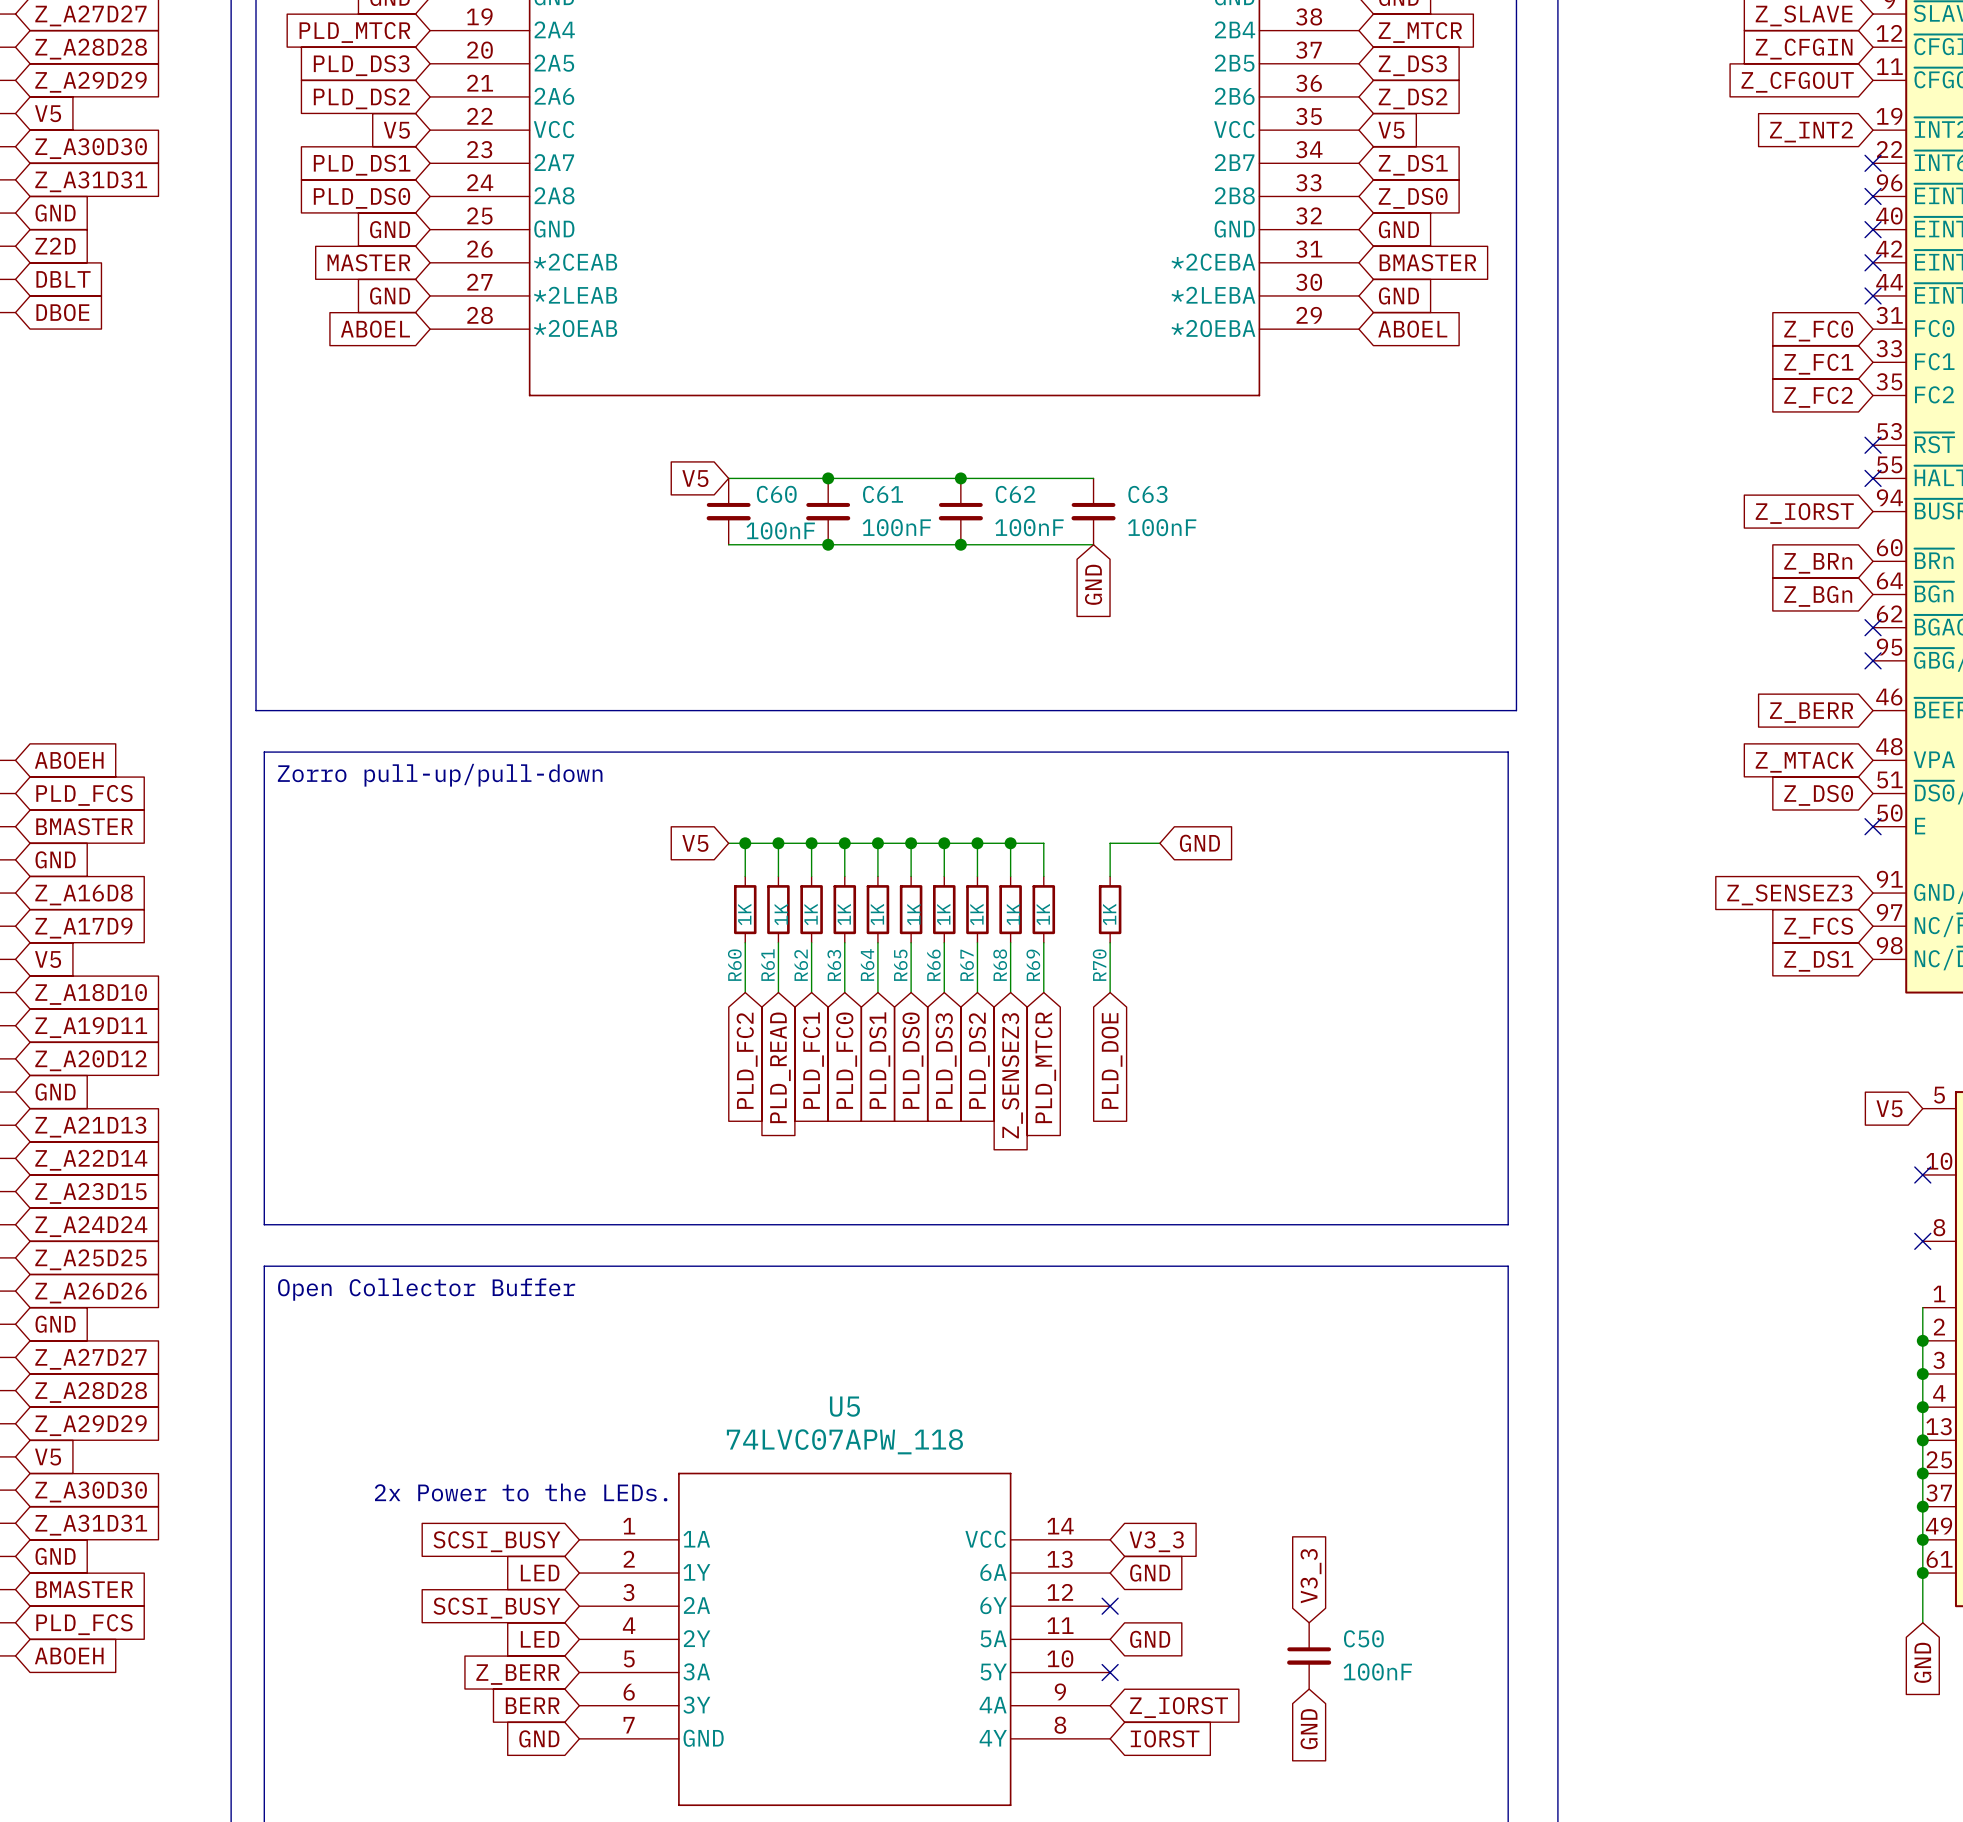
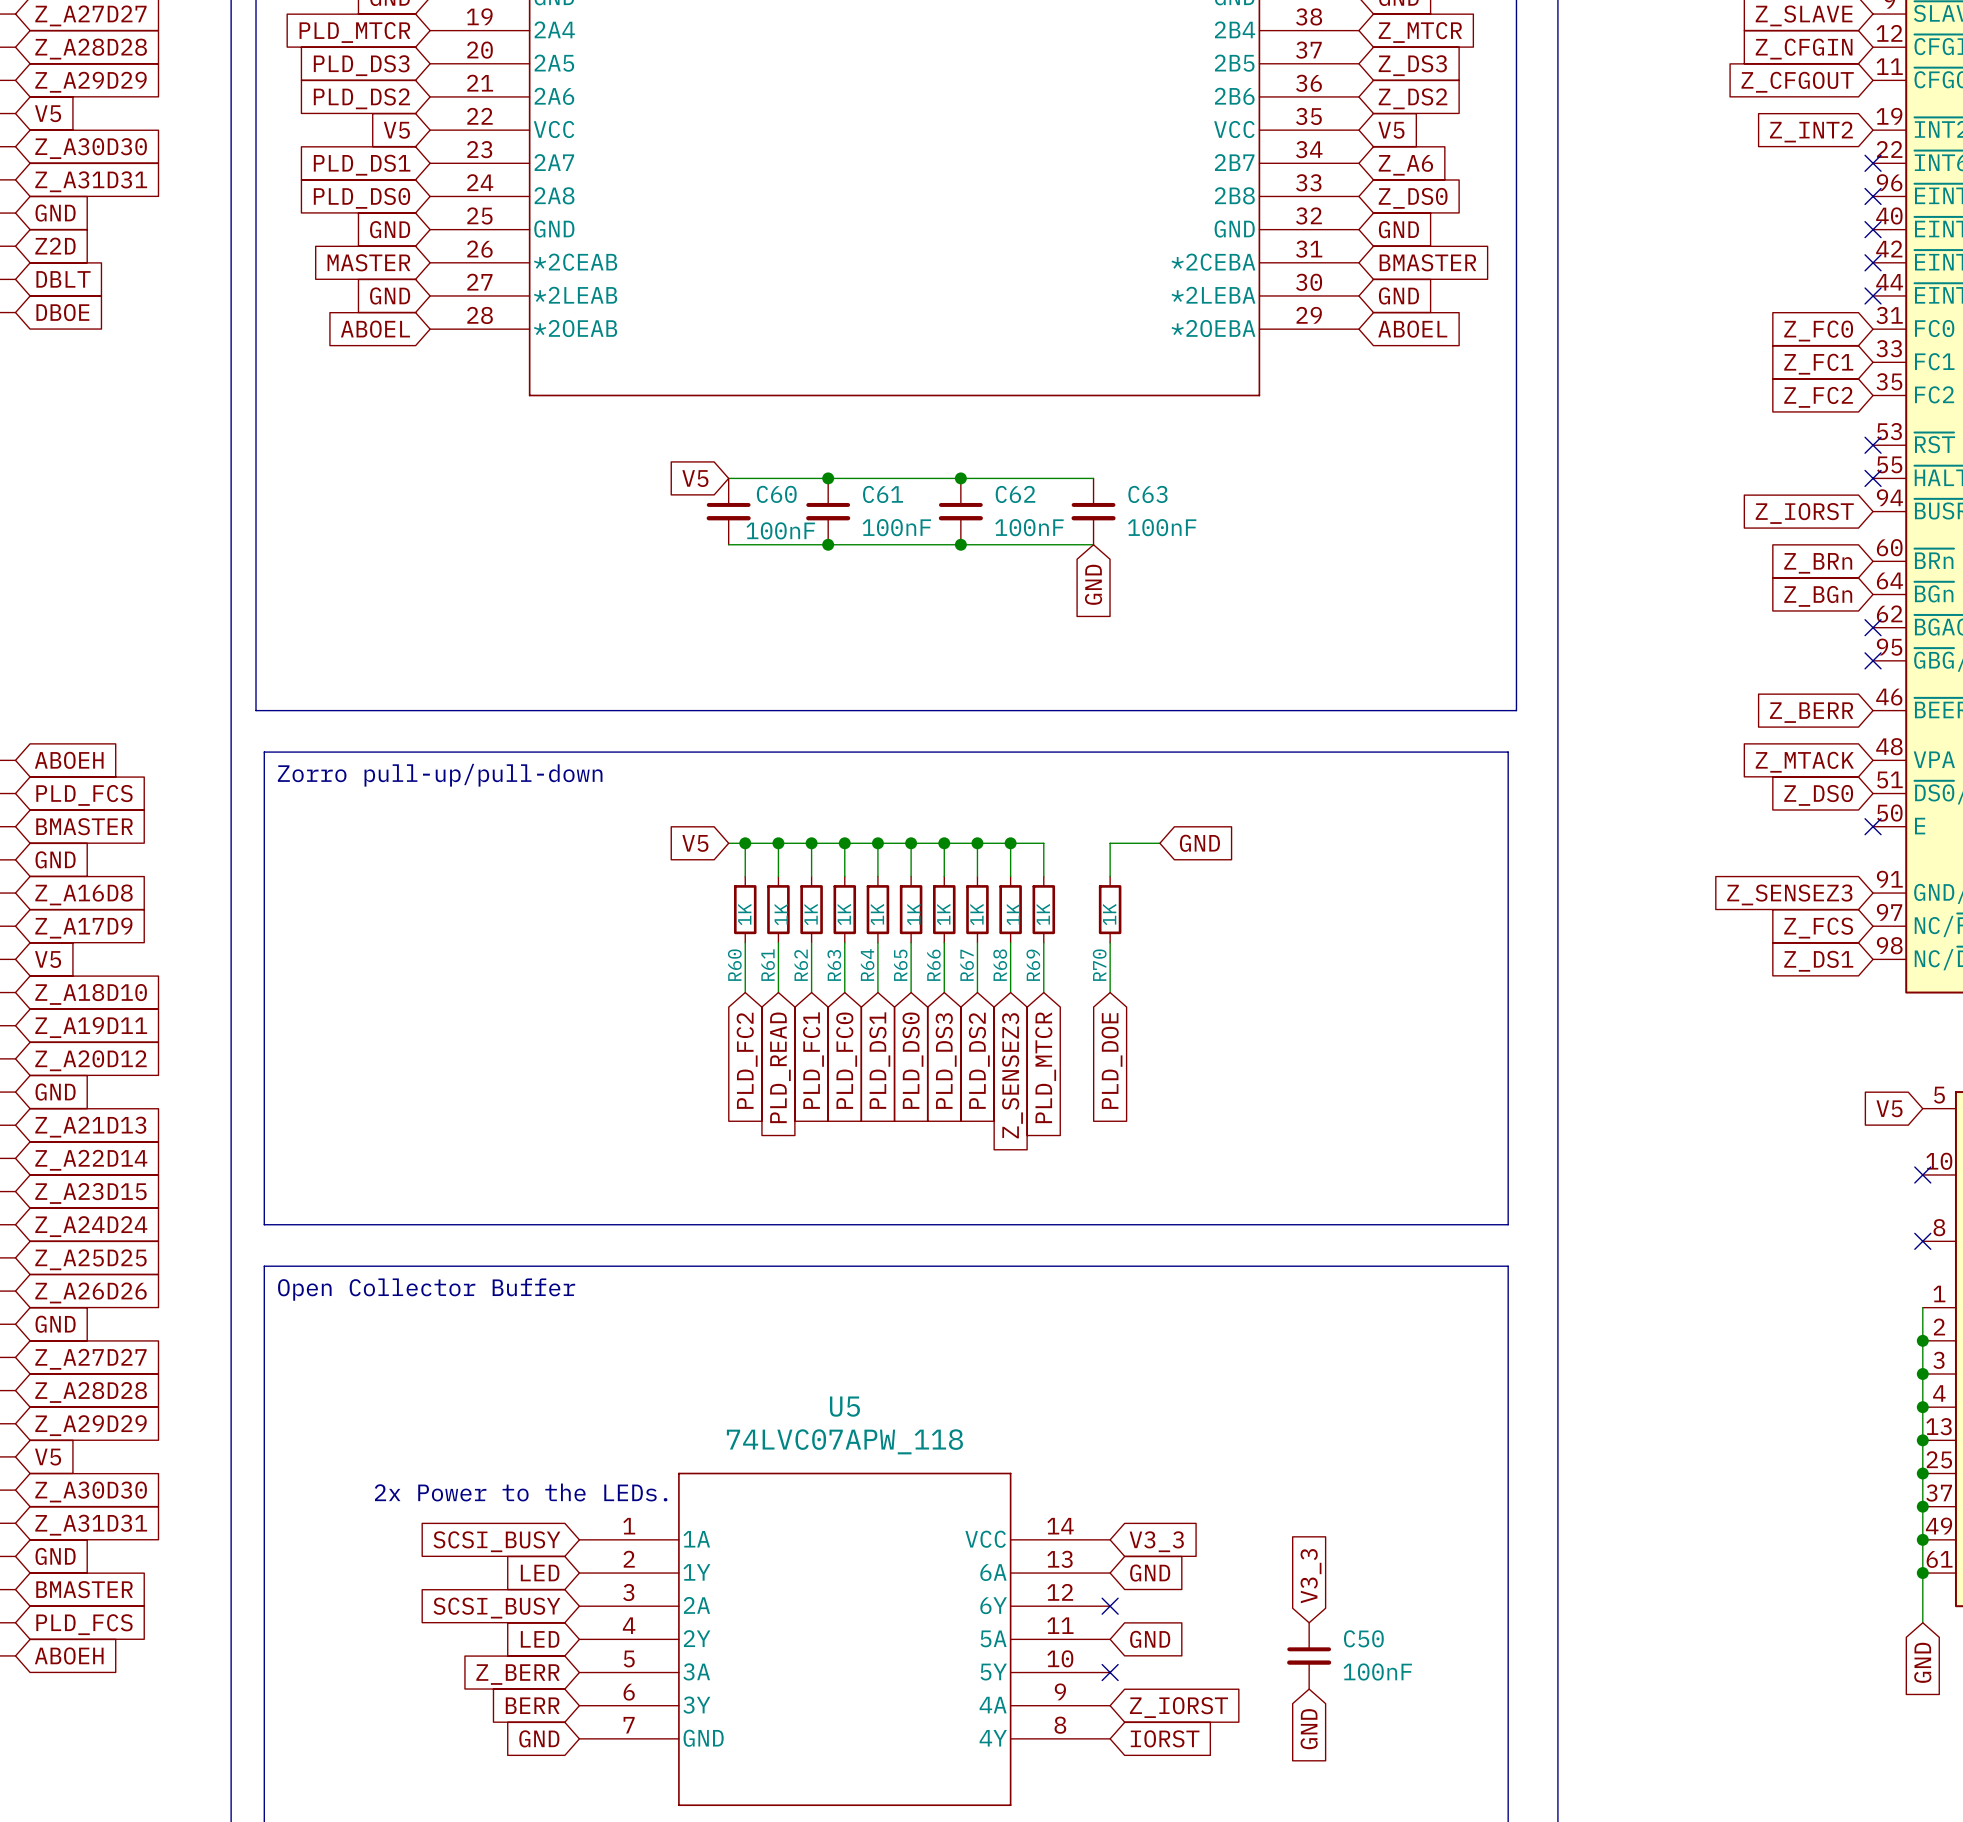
global label: Z_DS1 (1413, 165) -> Z_A6 (1405, 165)

